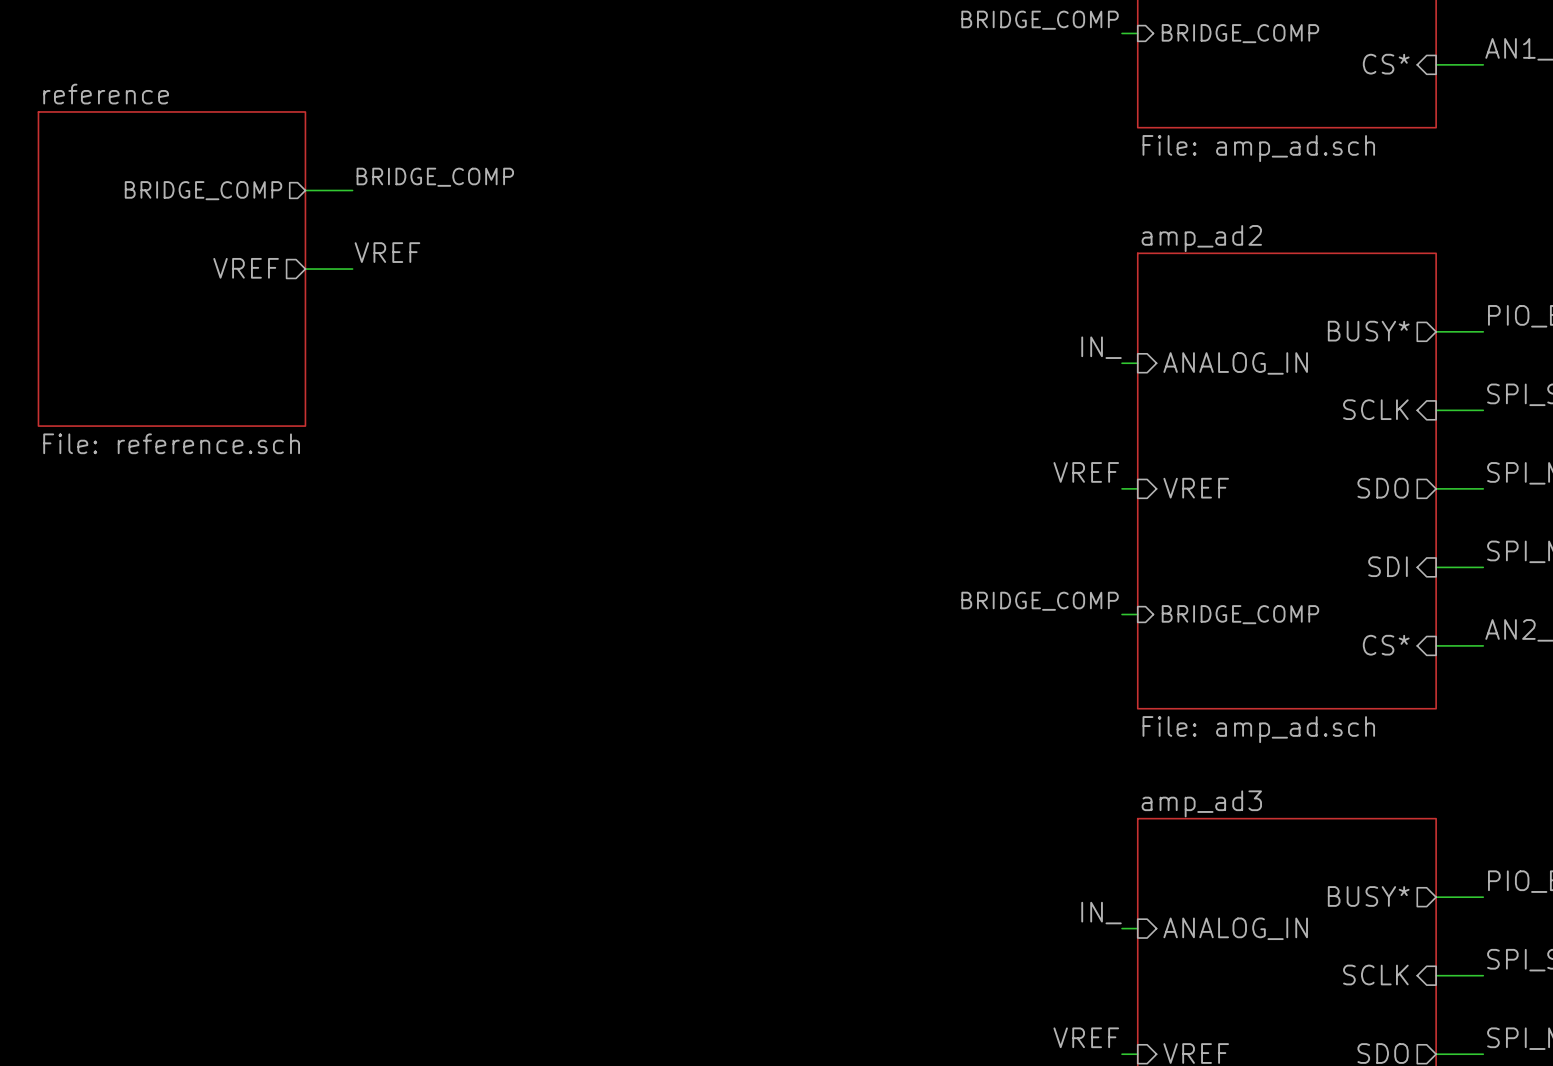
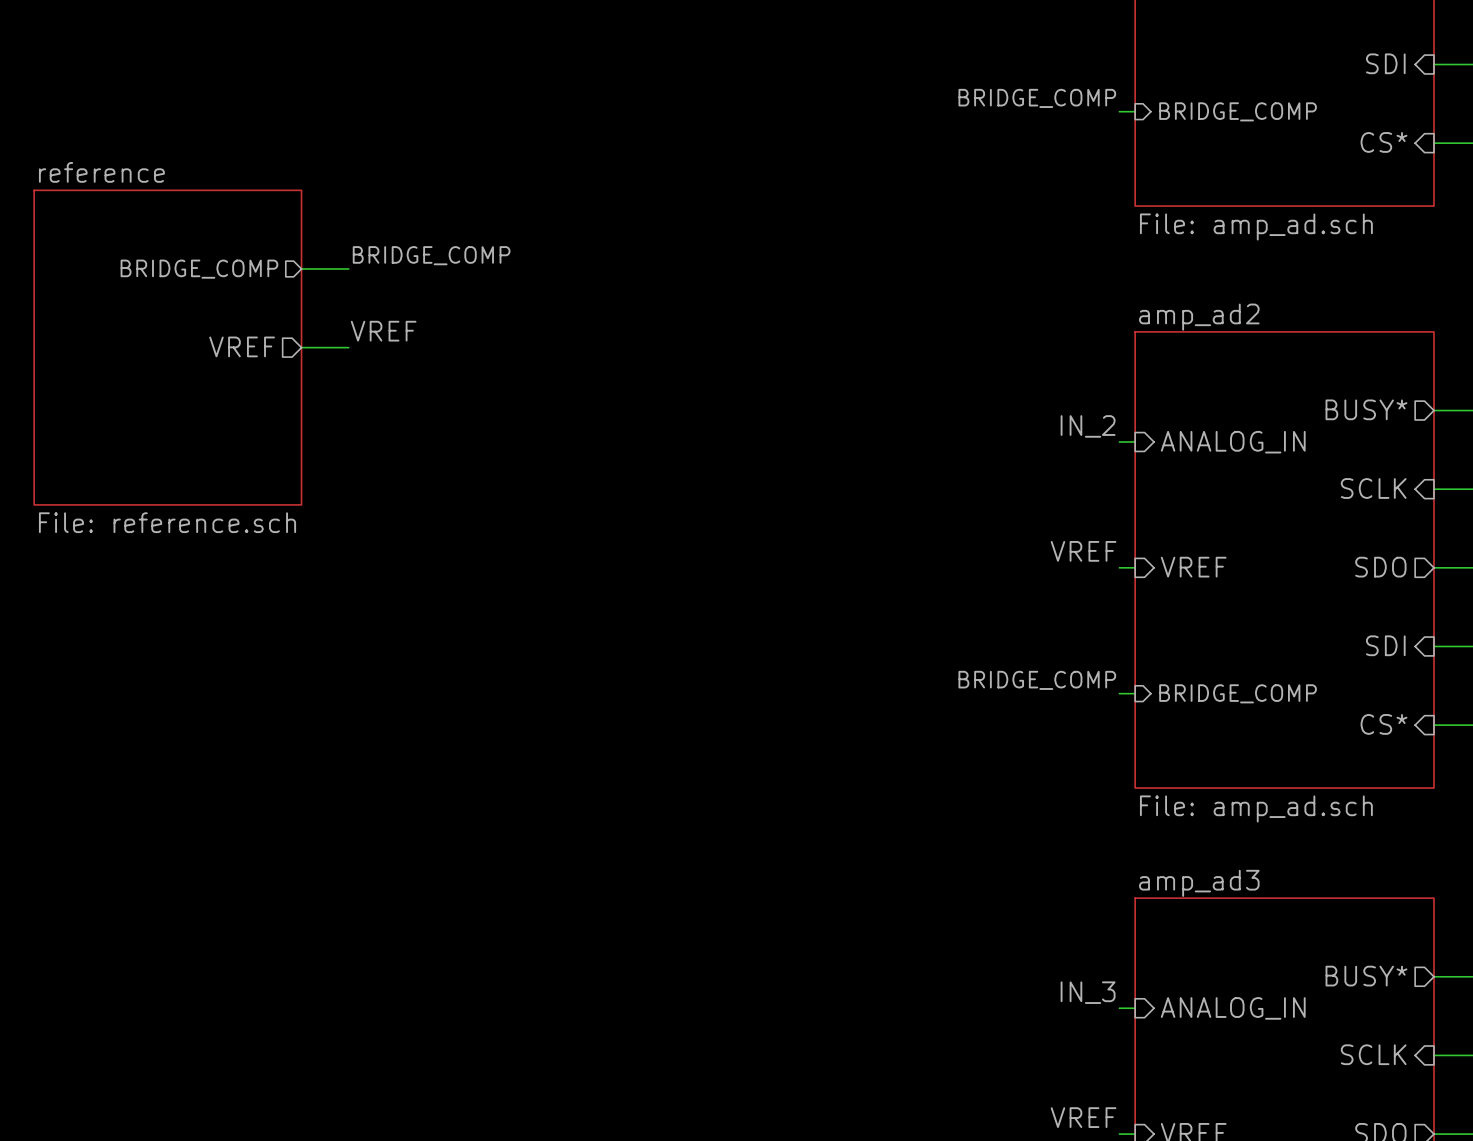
label: IN_ (1101, 347) -> IN_2 (1088, 426)
label: IN_ (1101, 913) -> IN_3 (1088, 992)

